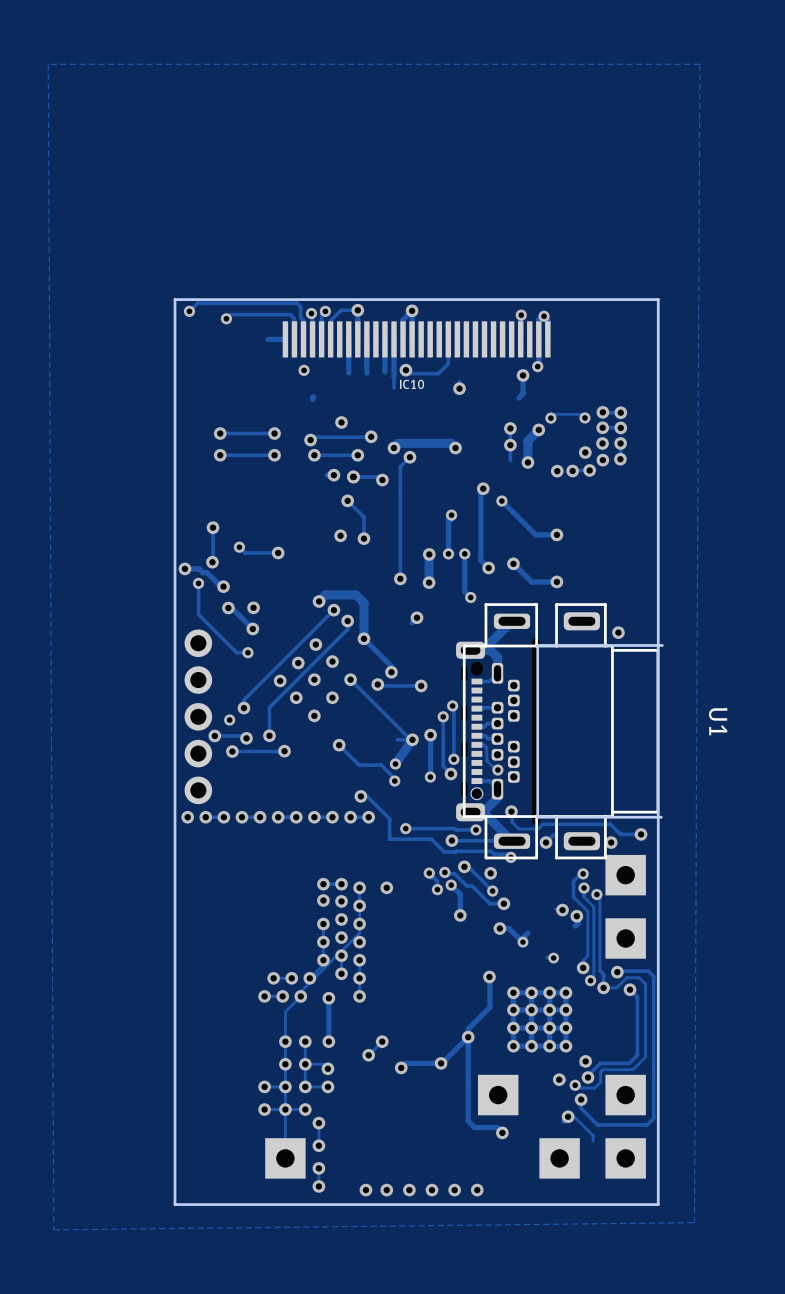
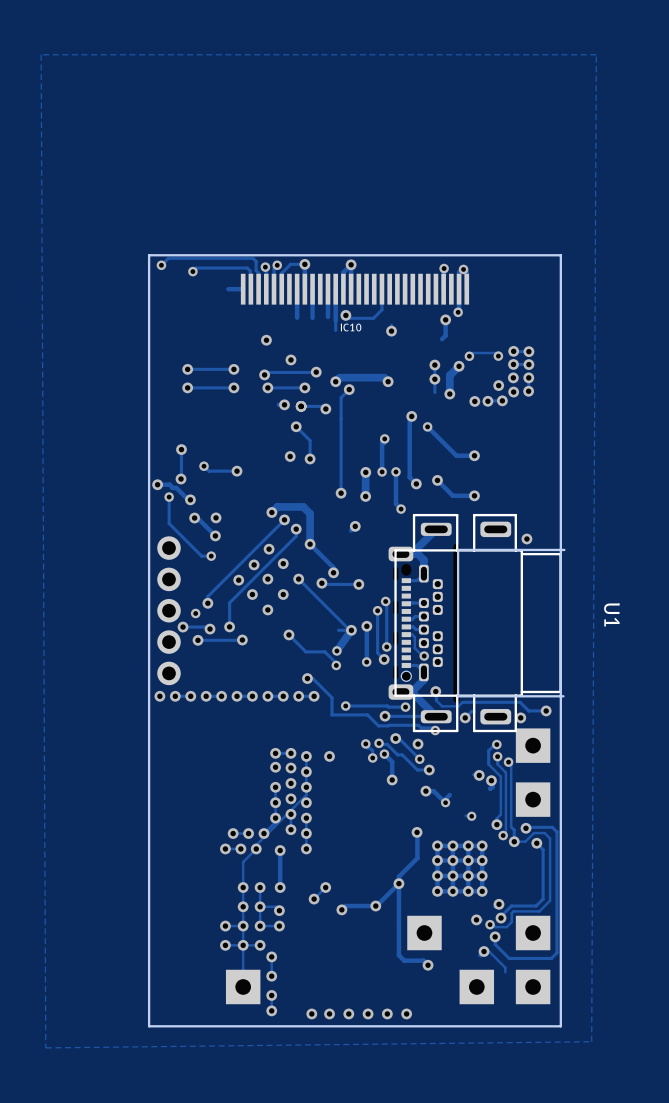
via: (304, 370) -> none
via: none -> (266, 340)

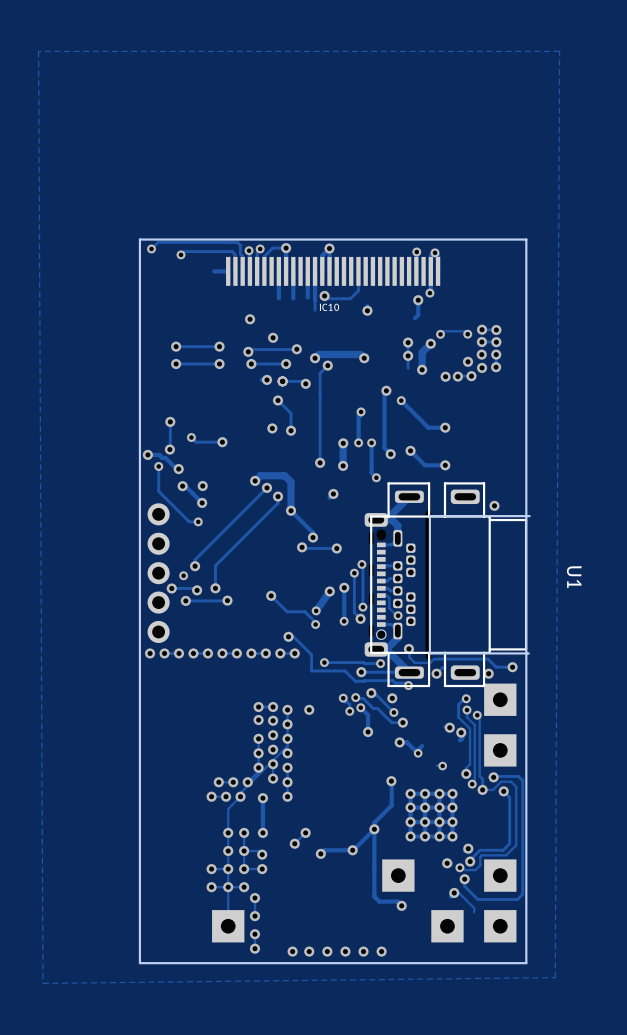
via: (269, 549) -> none
via: (283, 563) -> none
via: (254, 564) -> none
via: (267, 579) -> none
track: (298, 579) (349, 630) -> none
via: (298, 579) -> none
via: (238, 580) -> none
via: (252, 594) -> none
via: (283, 594) -> none
via: (267, 609) -> none
track: (351, 630) (338, 630) -> none

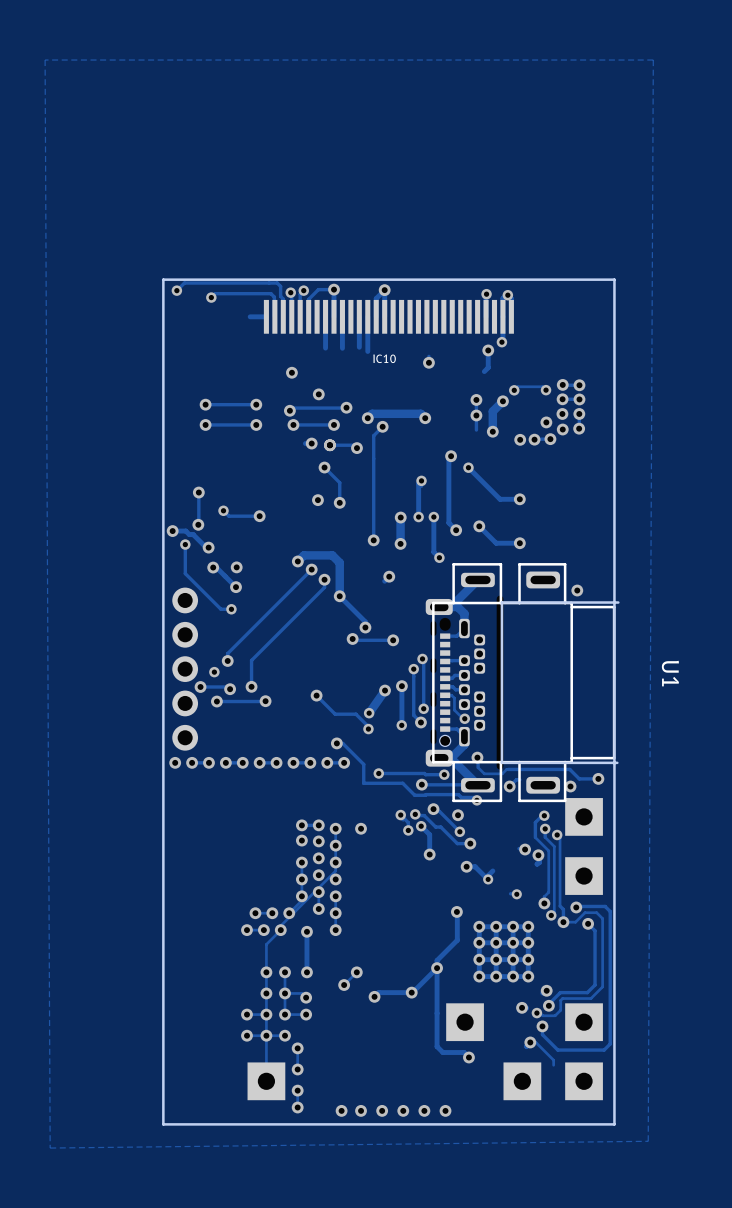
track: (358, 271) (358, 290) (350, 298) (328, 298) (324, 295) -> none
via: (324, 295) -> none
track: (315, 301) (315, 310) -> none

